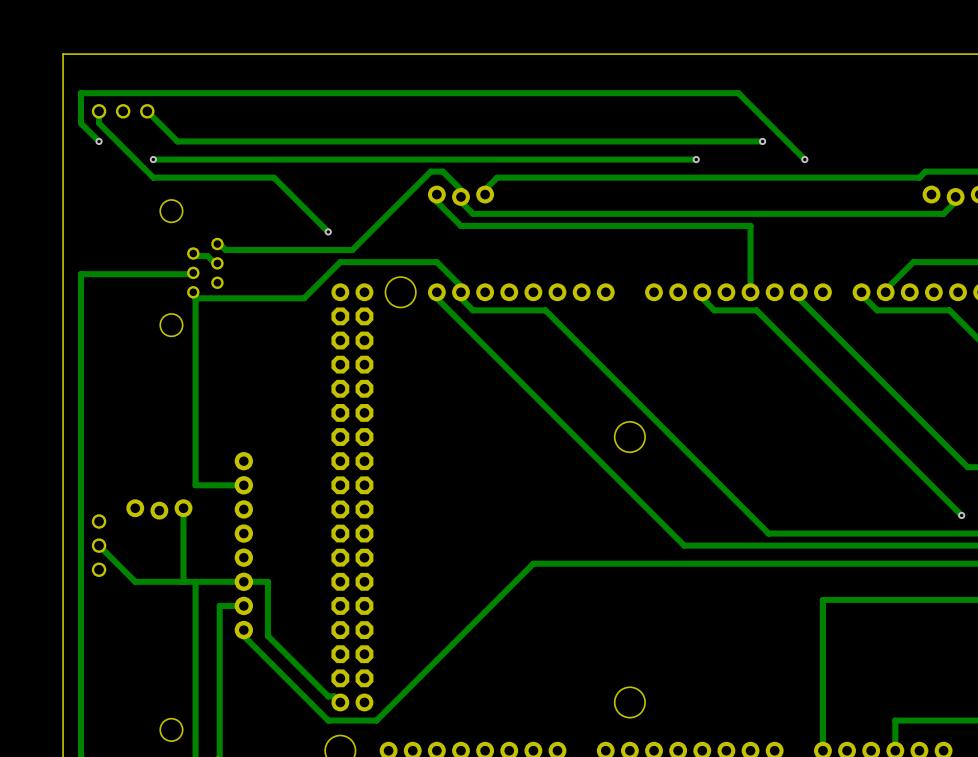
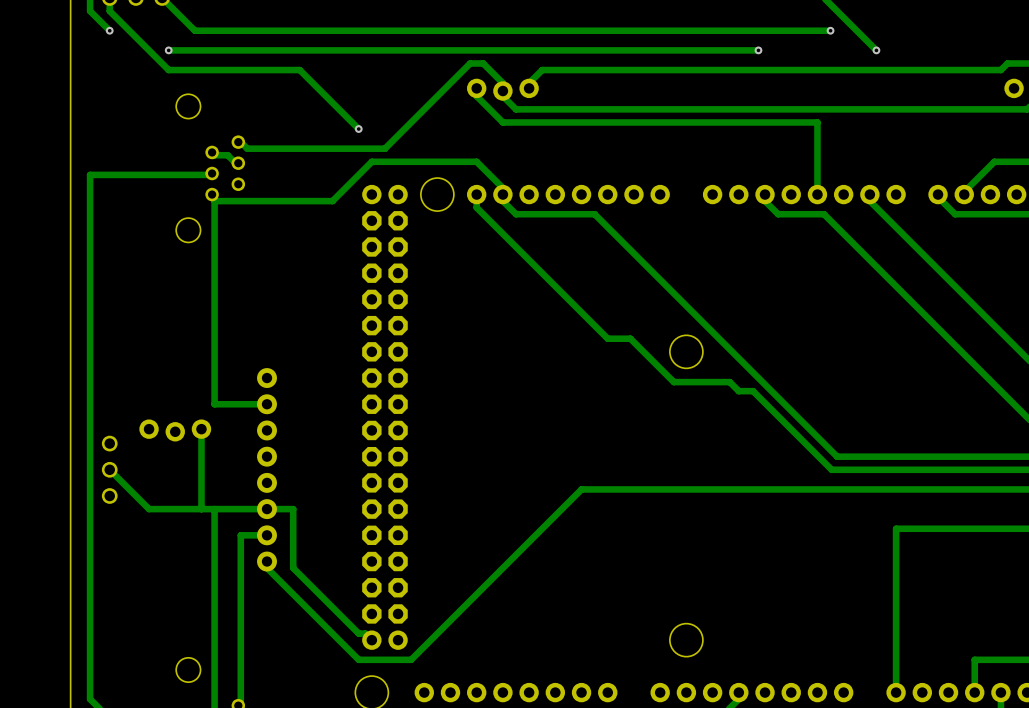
track: (436, 298) (684, 545) (763, 545) -> (476, 201) (476, 207) (607, 338) (630, 338) (673, 382) (729, 382) (738, 391) (753, 391) (831, 469)

